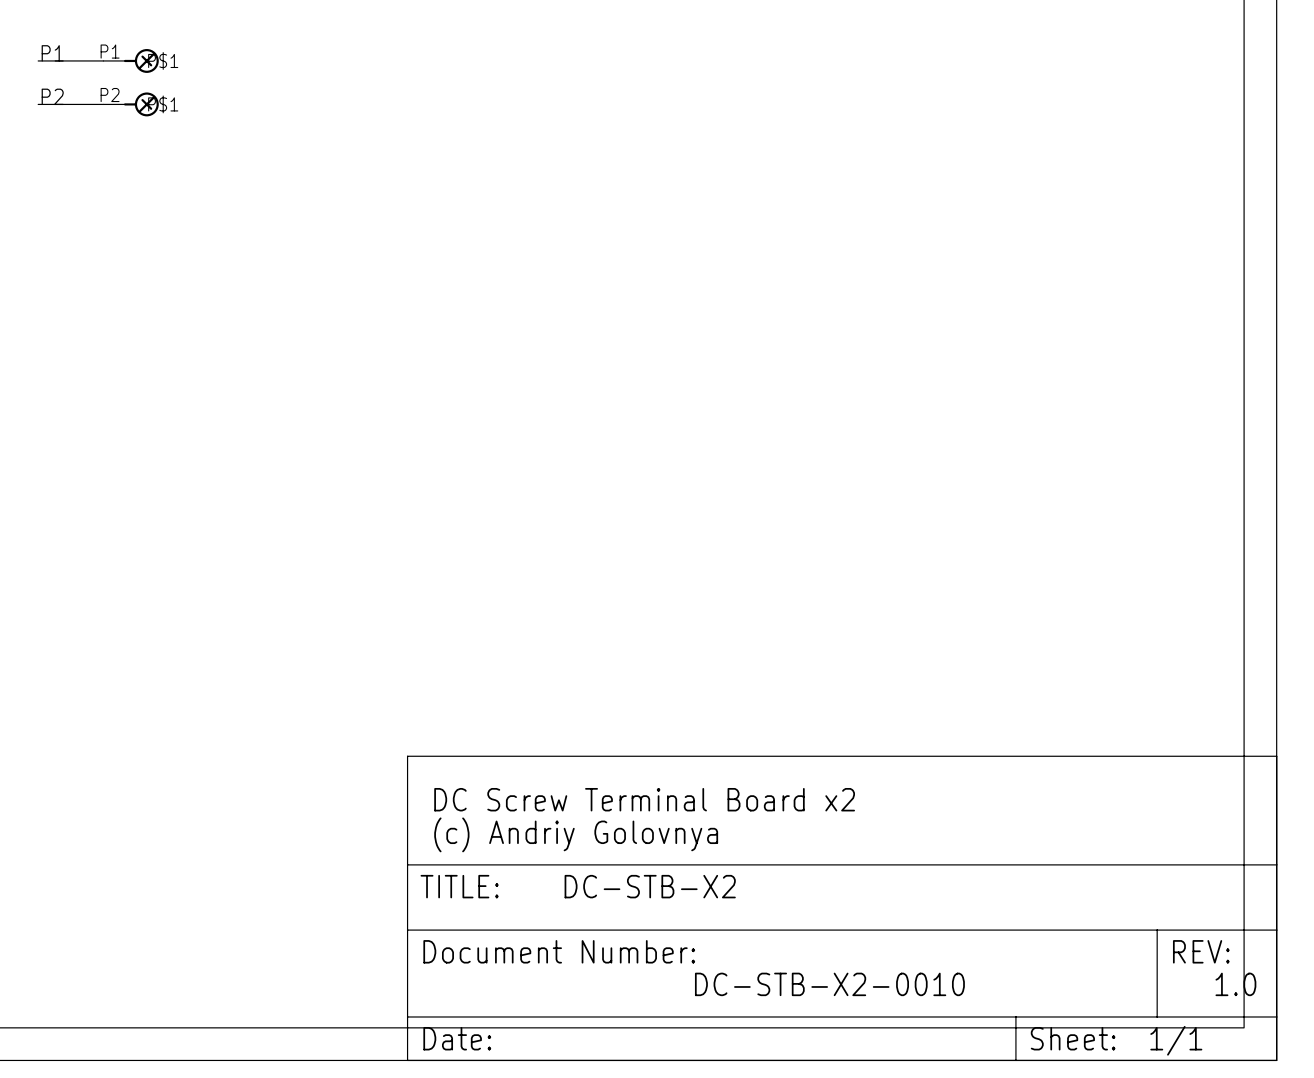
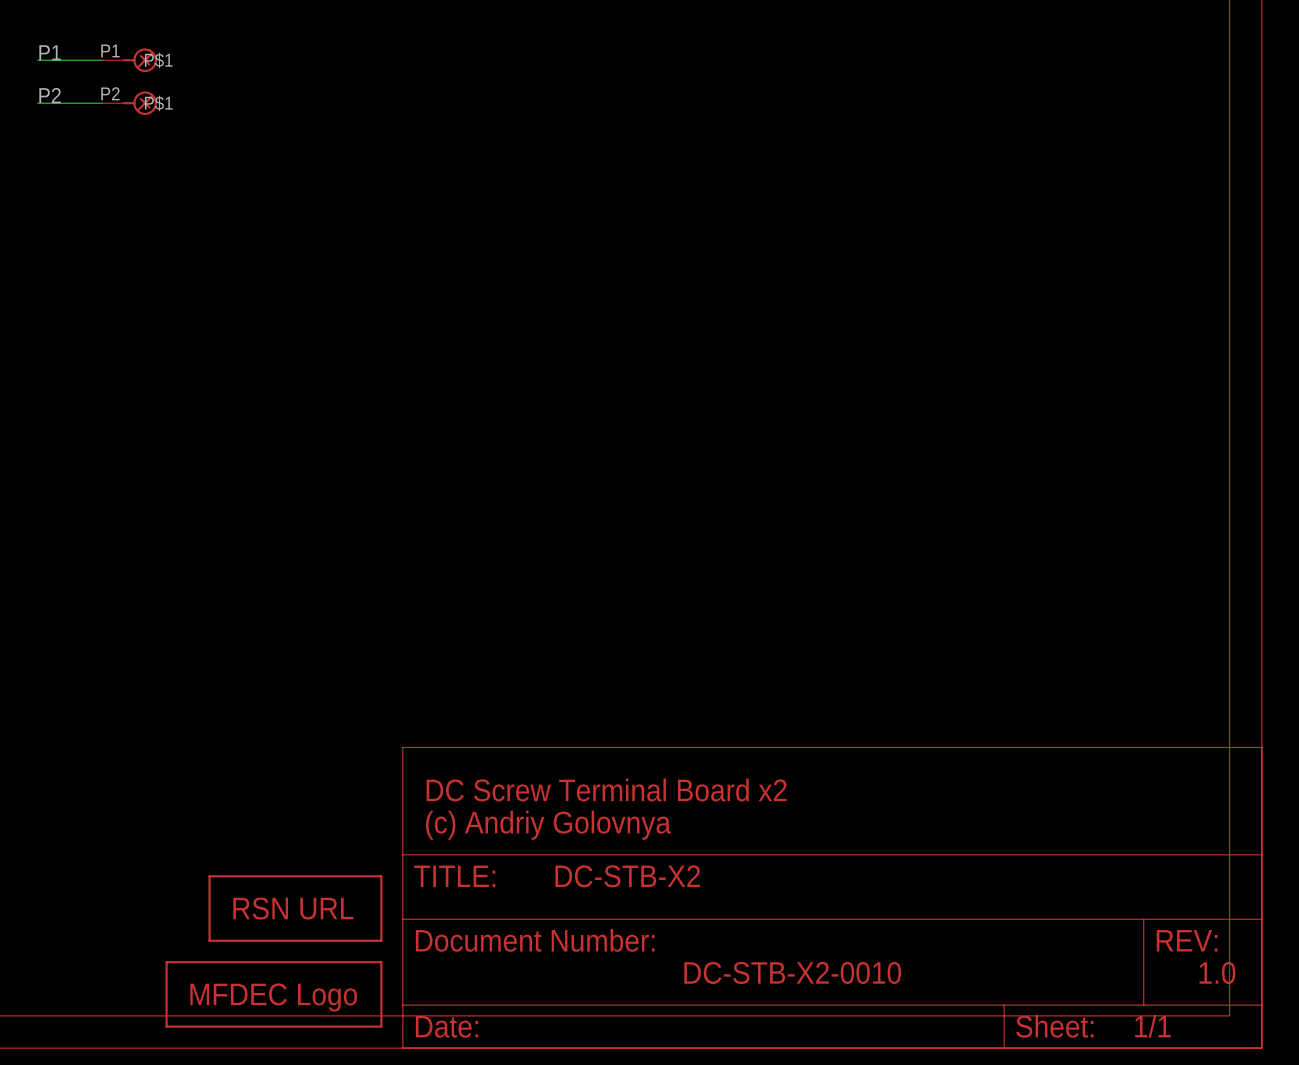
part: none -> (295, 908)
part: none -> (273, 994)

